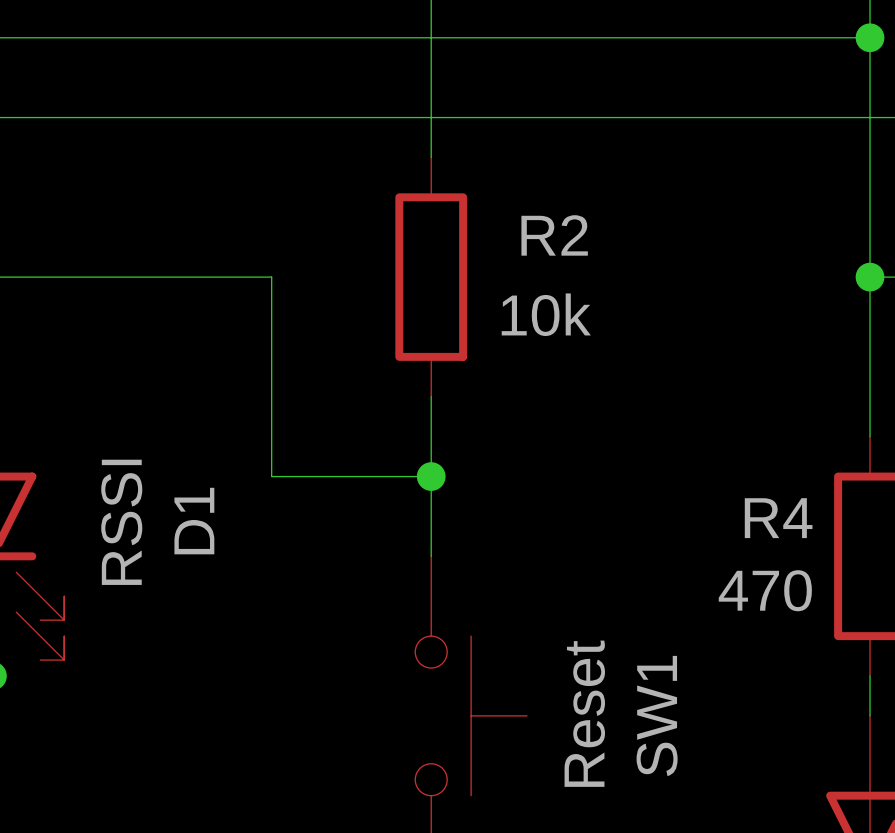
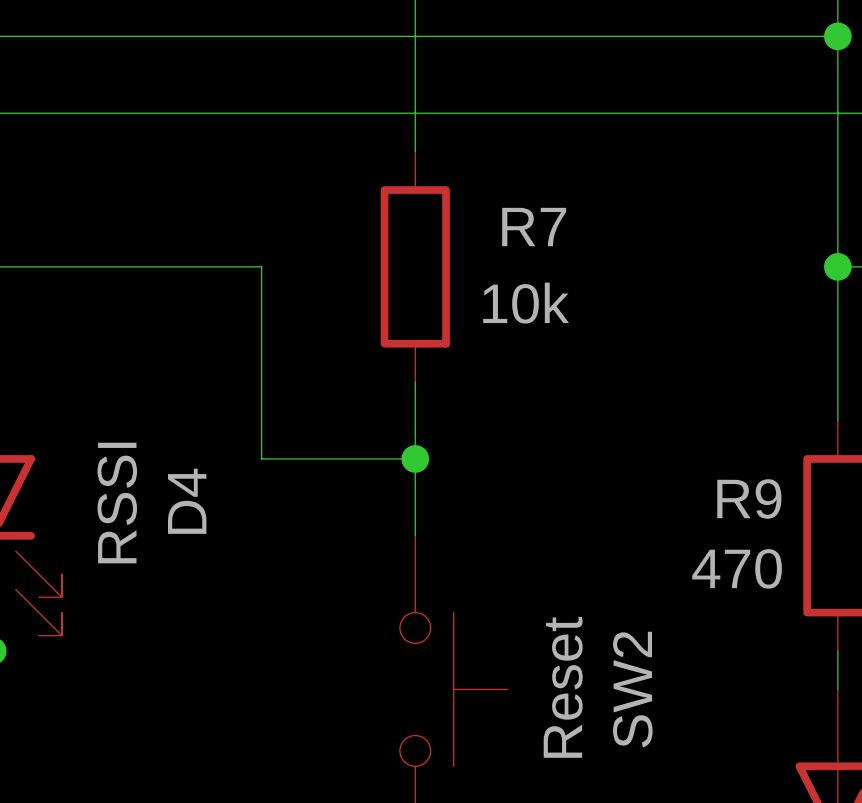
R2 name: R2 (554, 235) -> R7 (534, 227)
R4 name: R4 (778, 518) -> R9 (749, 498)
D1 name: D1 (194, 521) -> D4 (187, 501)
SW1 name: SW1 (657, 715) -> SW2 (632, 689)

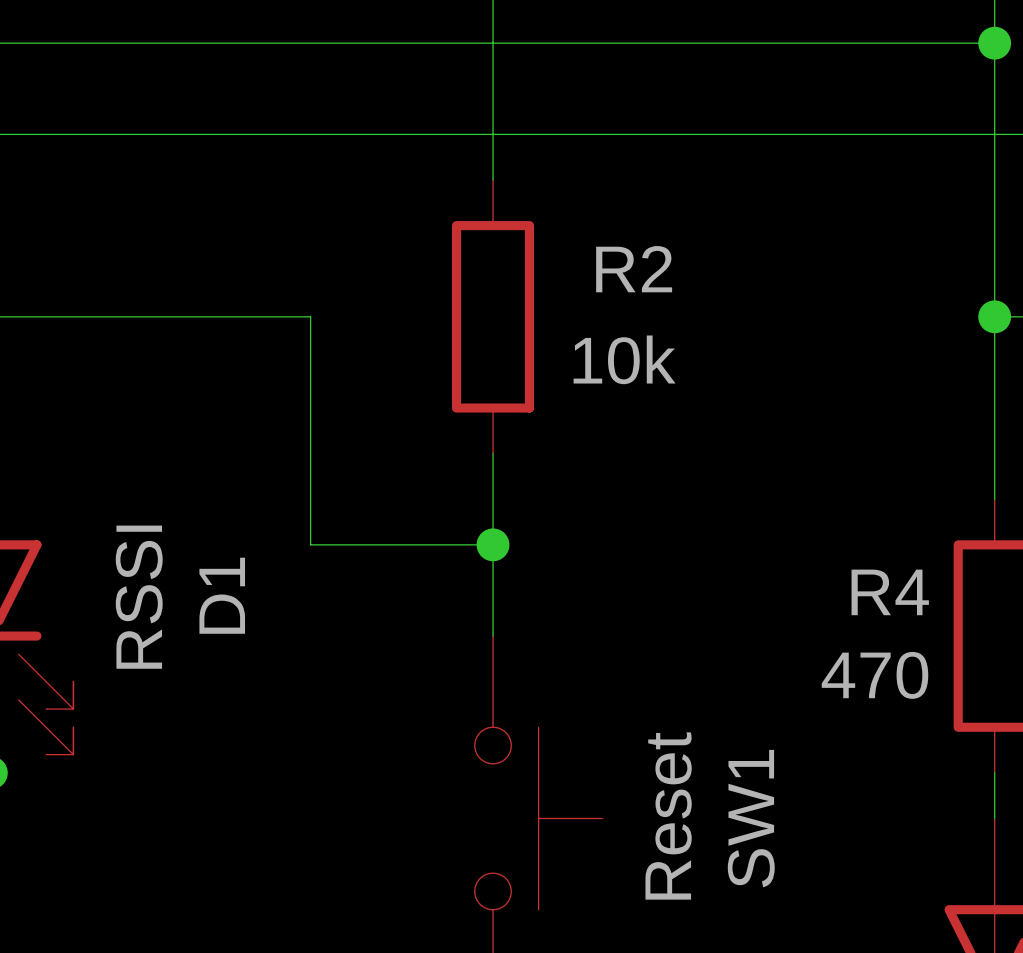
R7 name: R7 (534, 227) -> R2 (634, 269)
R9 name: R9 (749, 498) -> R4 (890, 592)
D4 name: D4 (187, 501) -> D1 (222, 595)
SW2 name: SW2 (632, 689) -> SW1 (751, 818)

